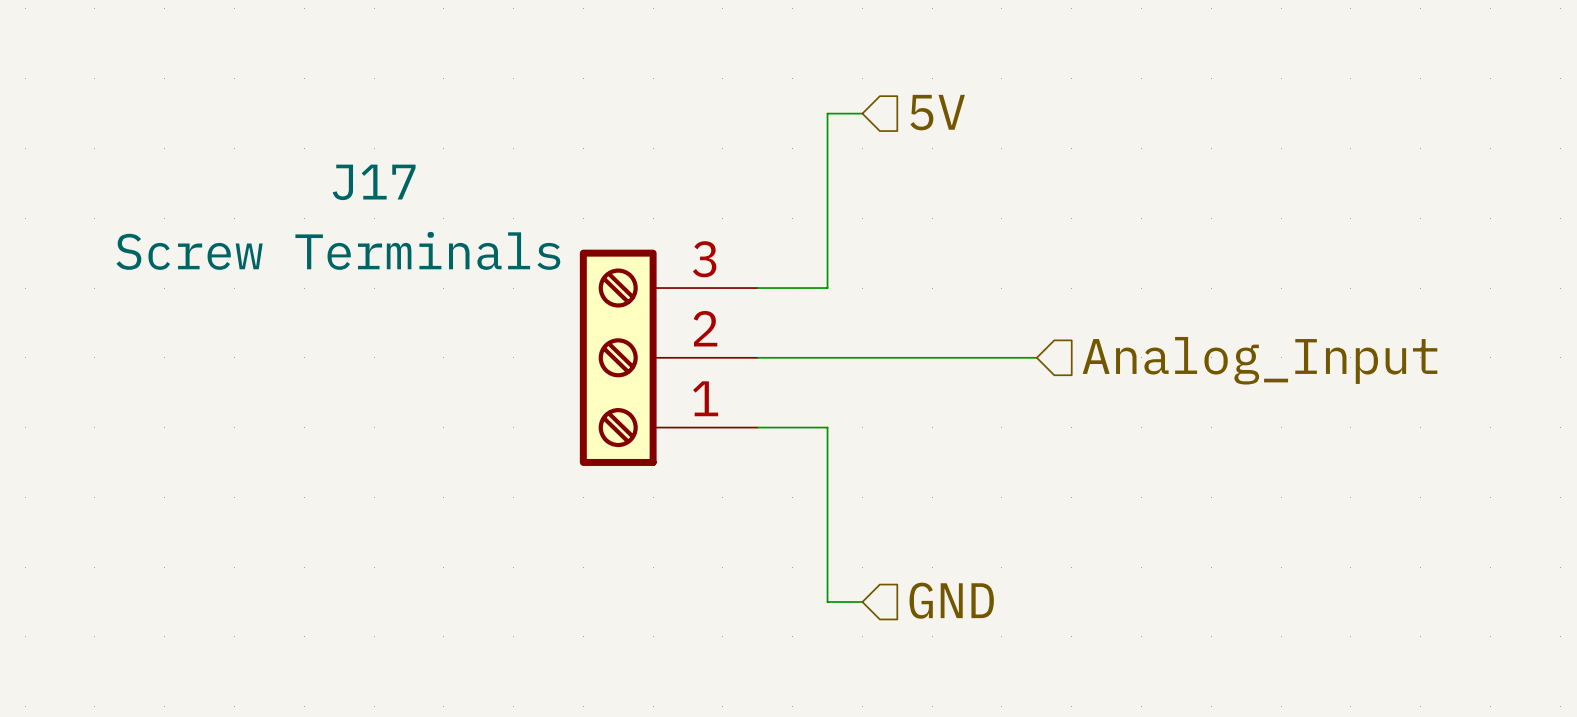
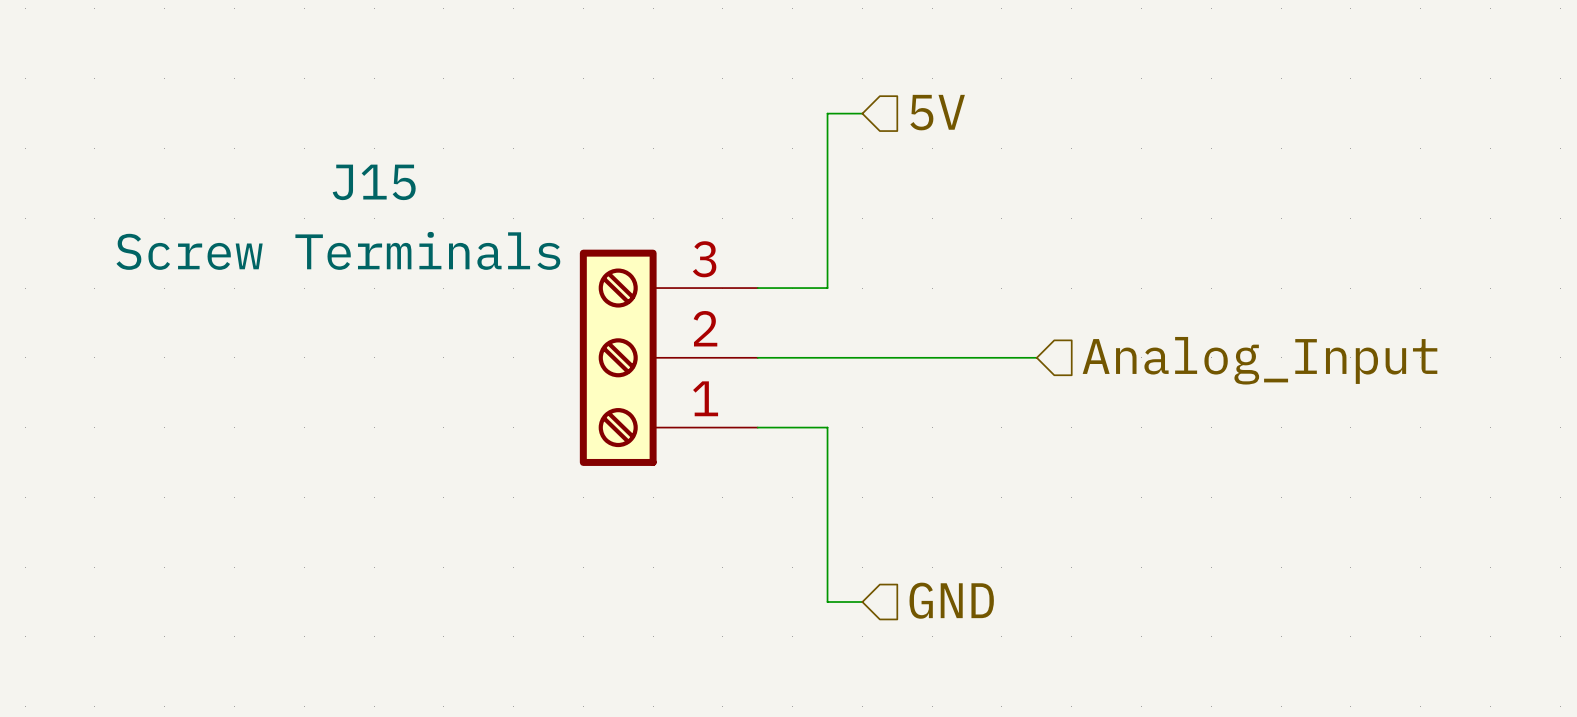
J17 name: J17 (374, 182) -> J15 (374, 182)

